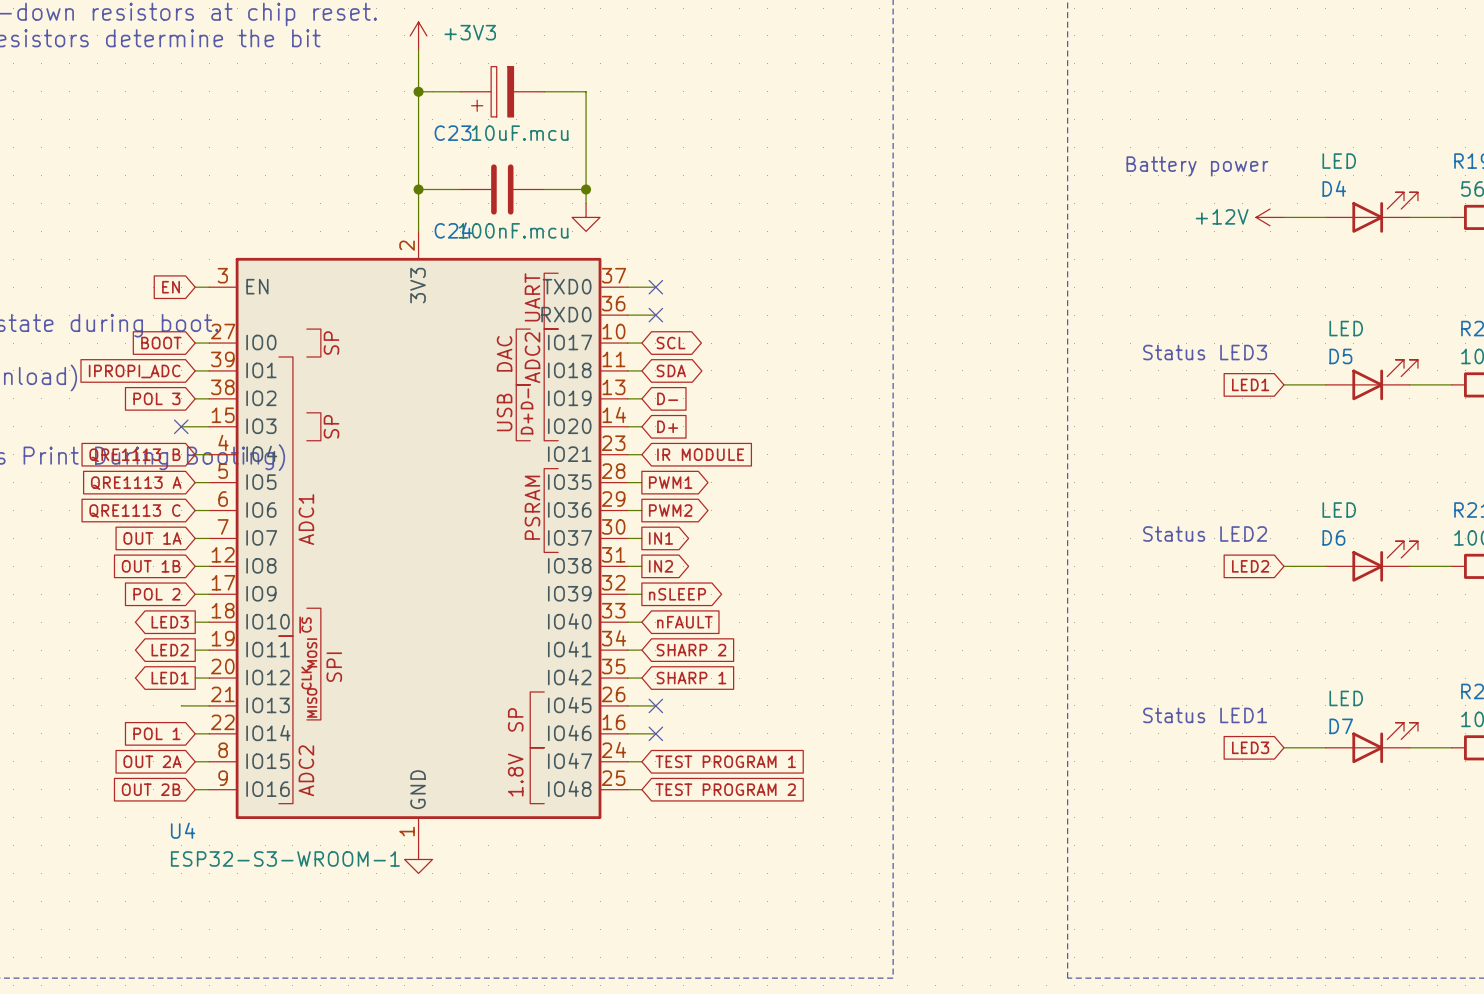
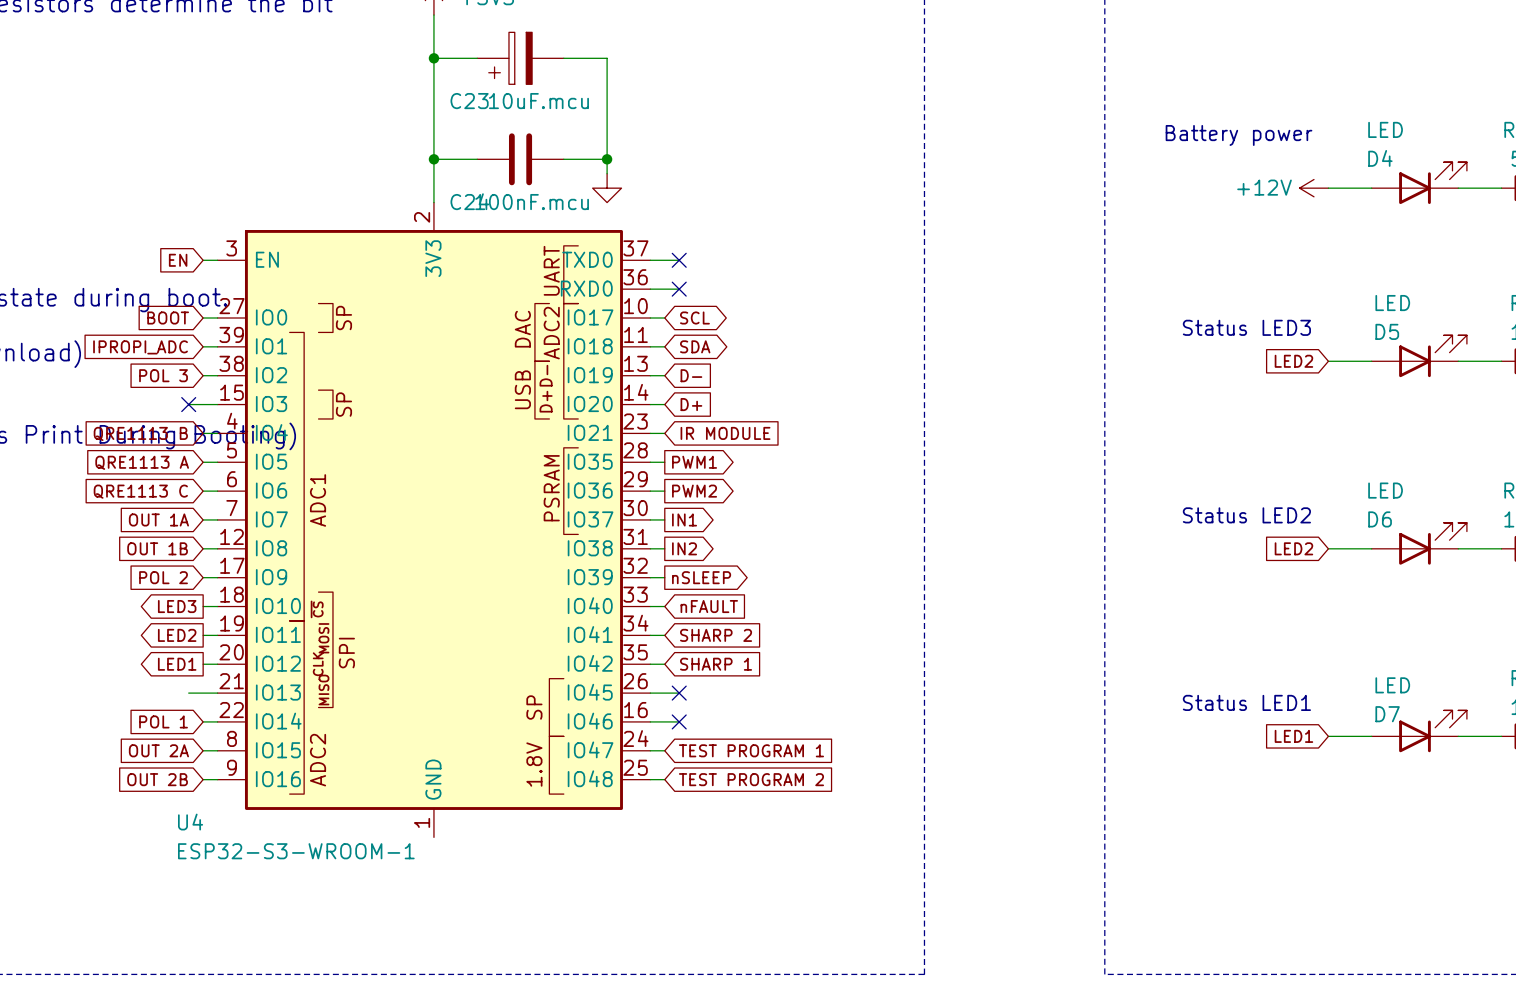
global label: LED1 (1250, 384) -> LED2 (1293, 361)
global label: LED3 (1250, 747) -> LED1 (1293, 736)
power symbol: (418, 859) -> none

